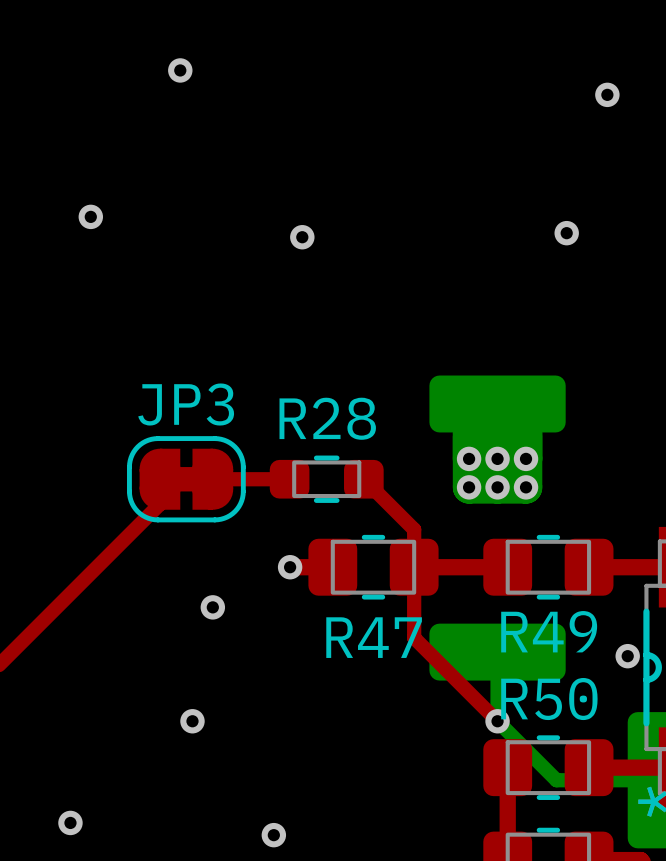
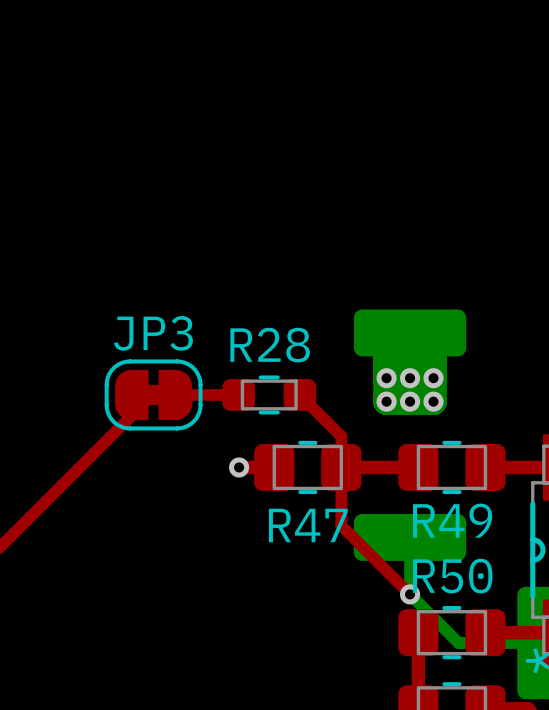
via: (180, 70) -> none
via: (607, 94) -> none
via: (90, 216) -> none
via: (566, 233) -> none
via: (302, 237) -> none
via: (212, 607) -> none
via: (627, 656) -> none
via: (192, 721) -> none
via: (70, 822) -> none
via: (273, 835) -> none

